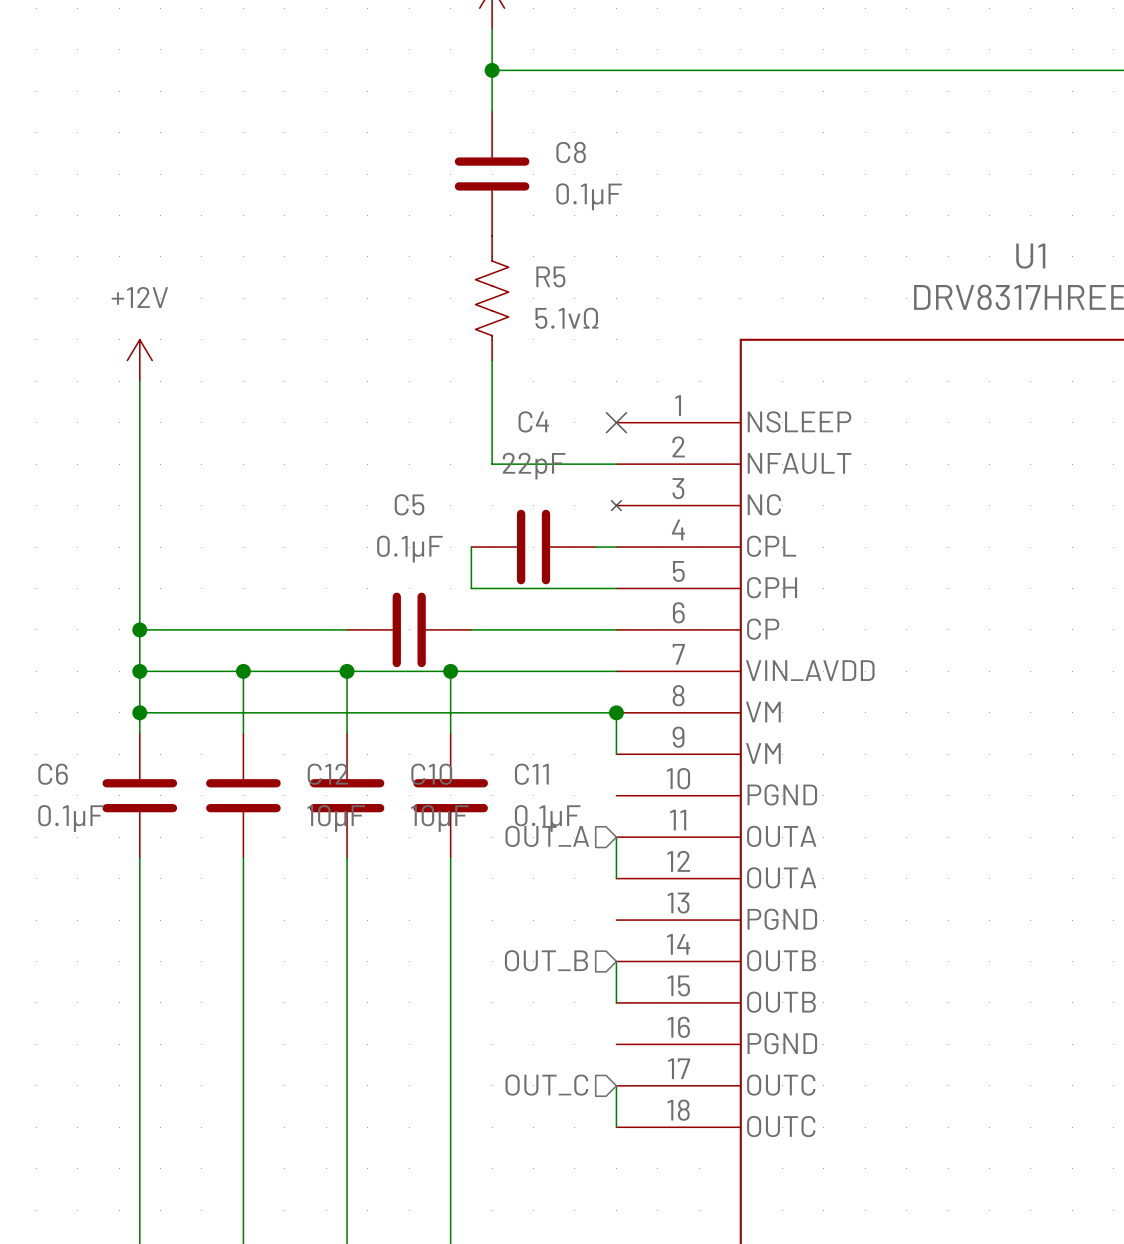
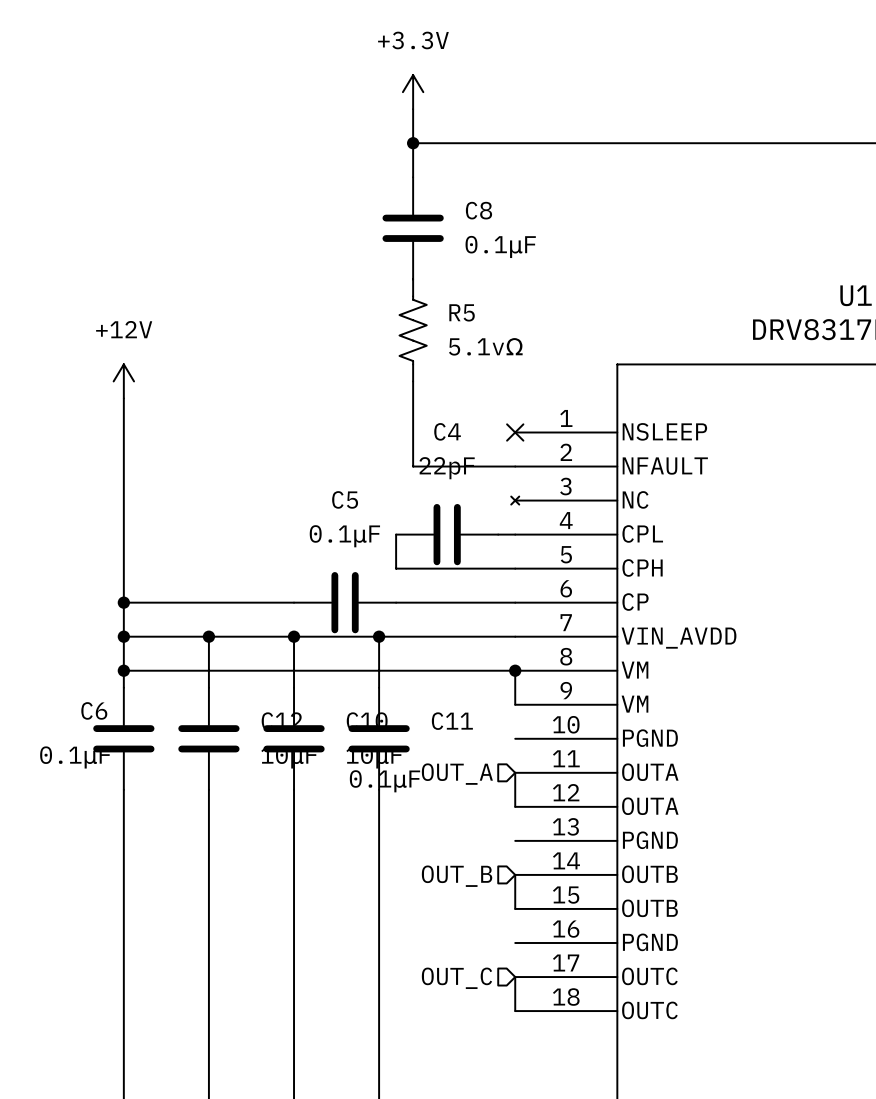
C6 name position: C6 (53, 774) -> C6 (94, 710)
C11 value position: 0.1μF (547, 818) -> 0.1μF (384, 781)

